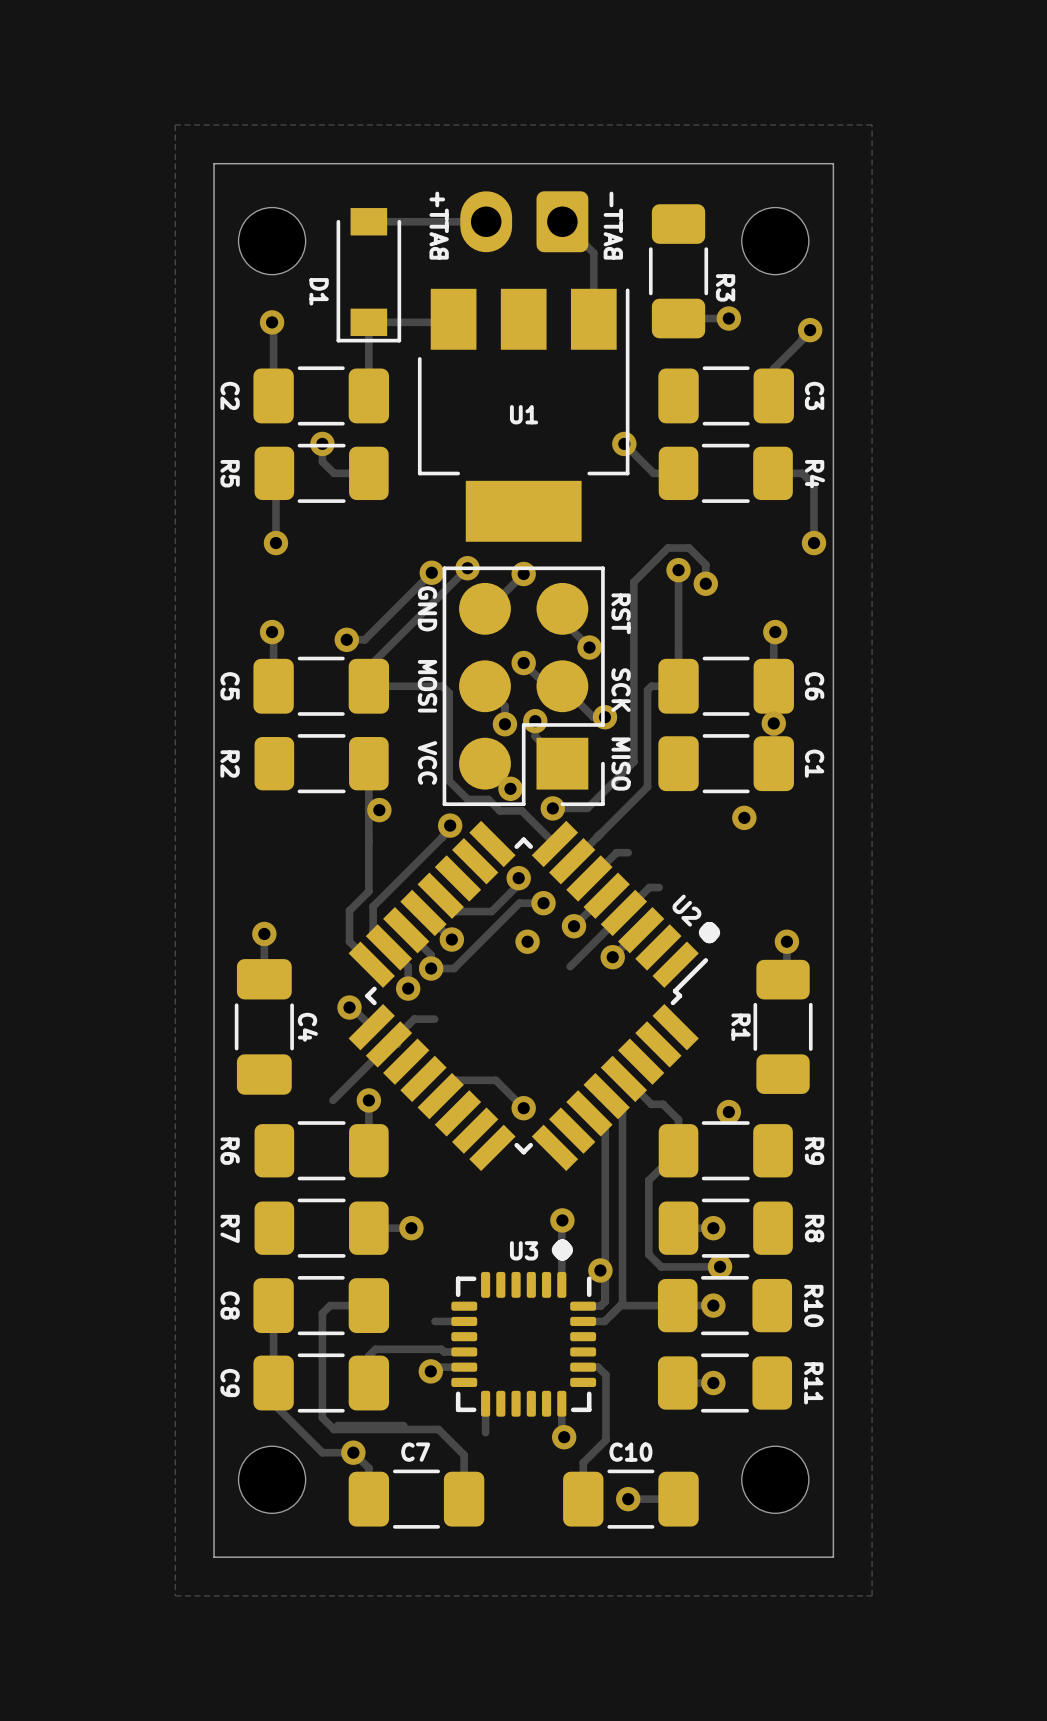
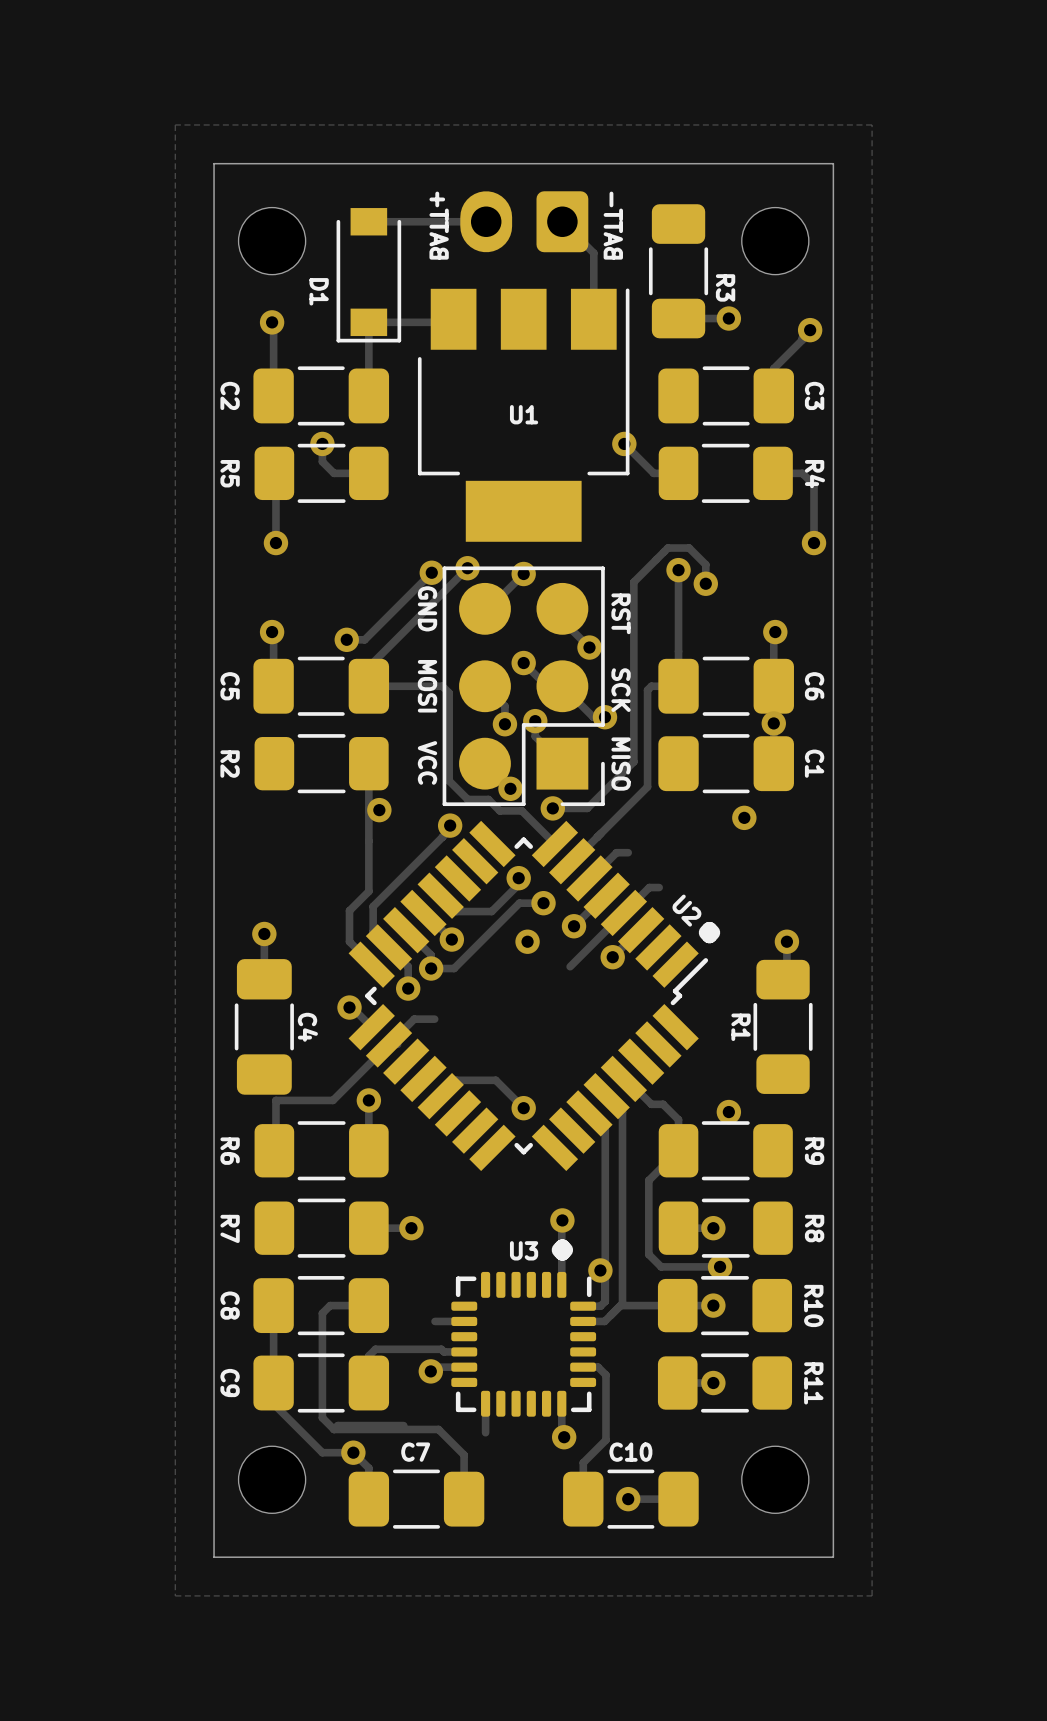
track: none -> (332, 1100) (275, 1100) (275, 1149)

